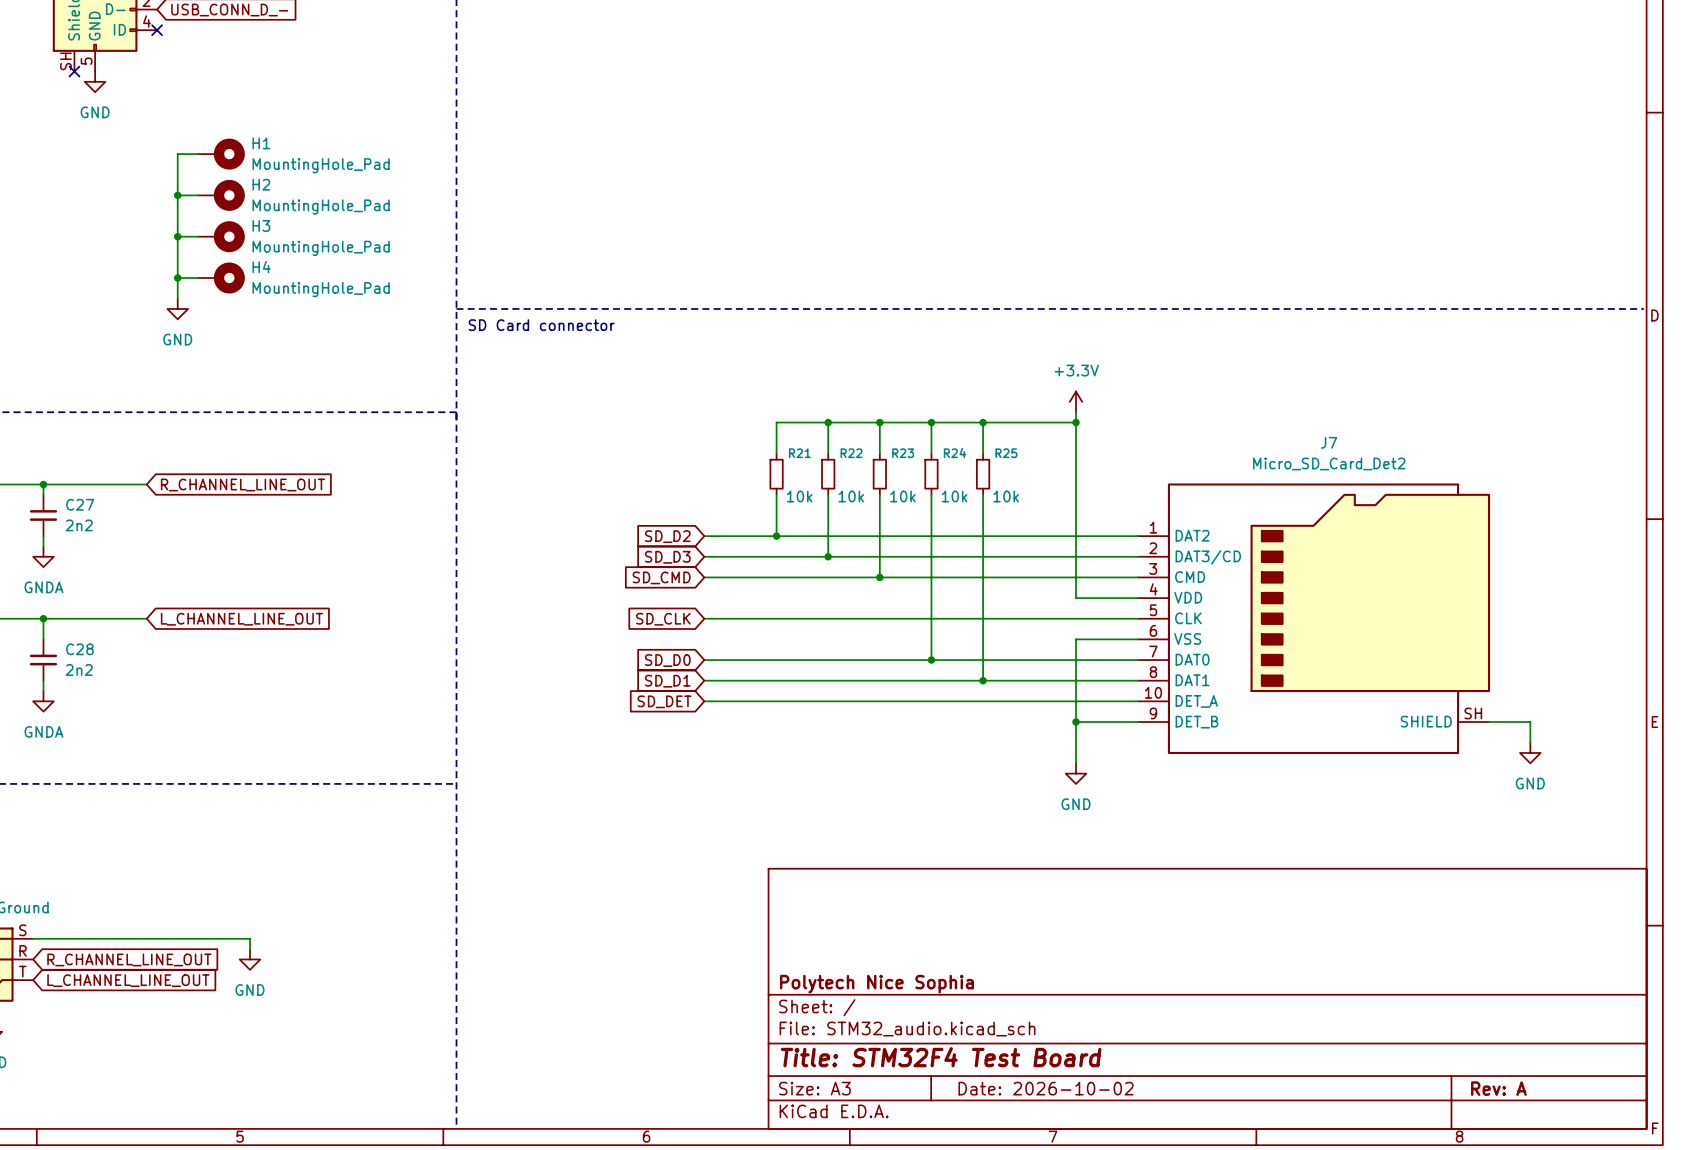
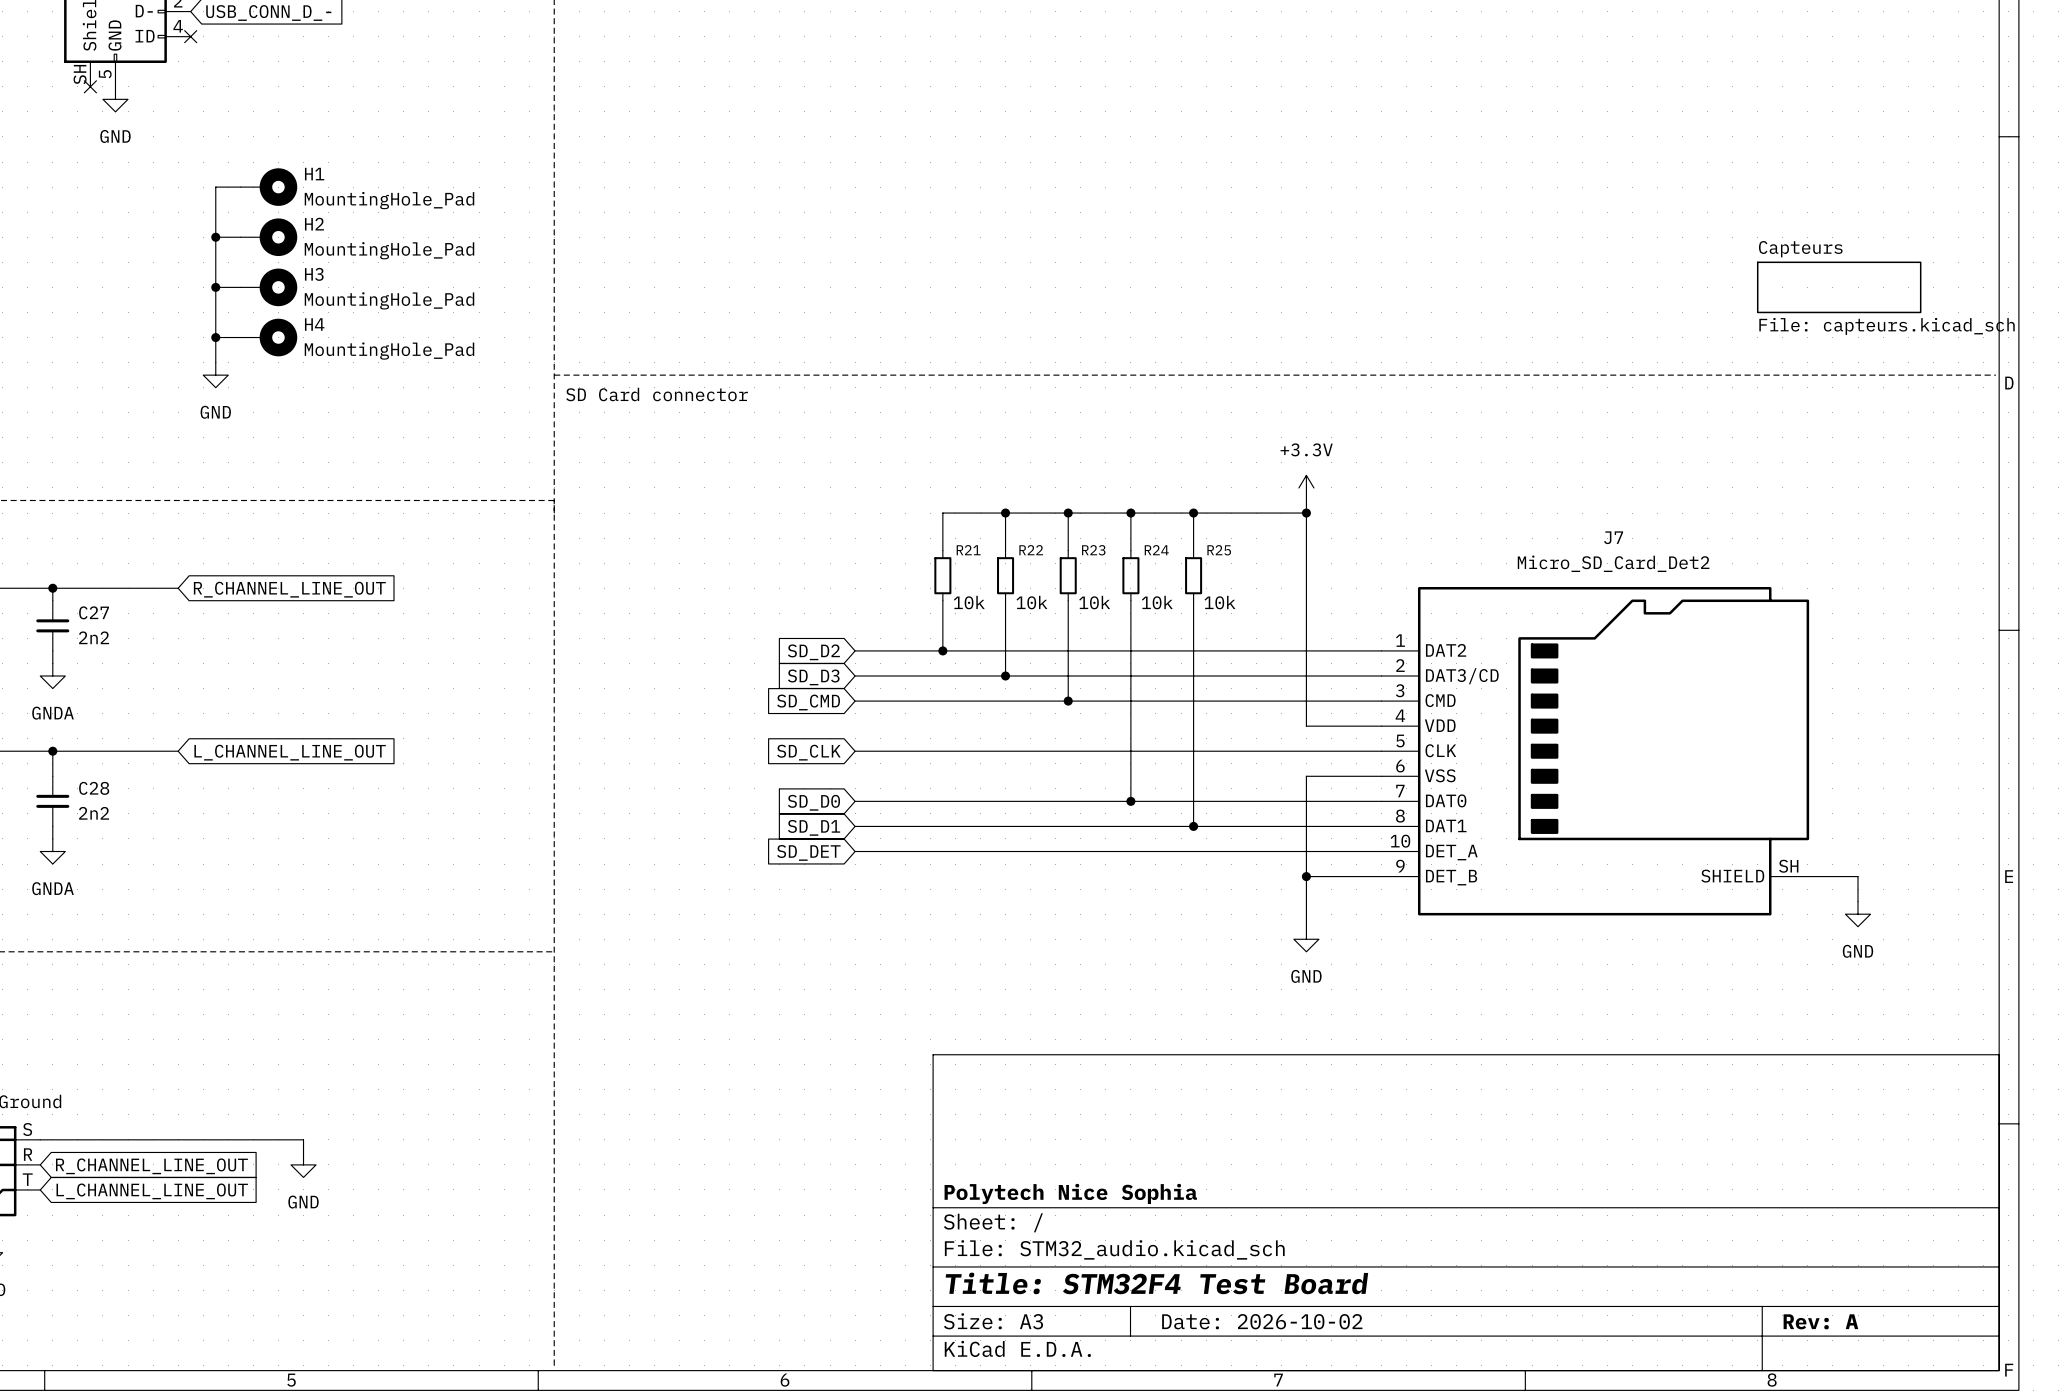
sheet Capteurs: none -> File: capteurs.kicad_sch (1839, 287)

